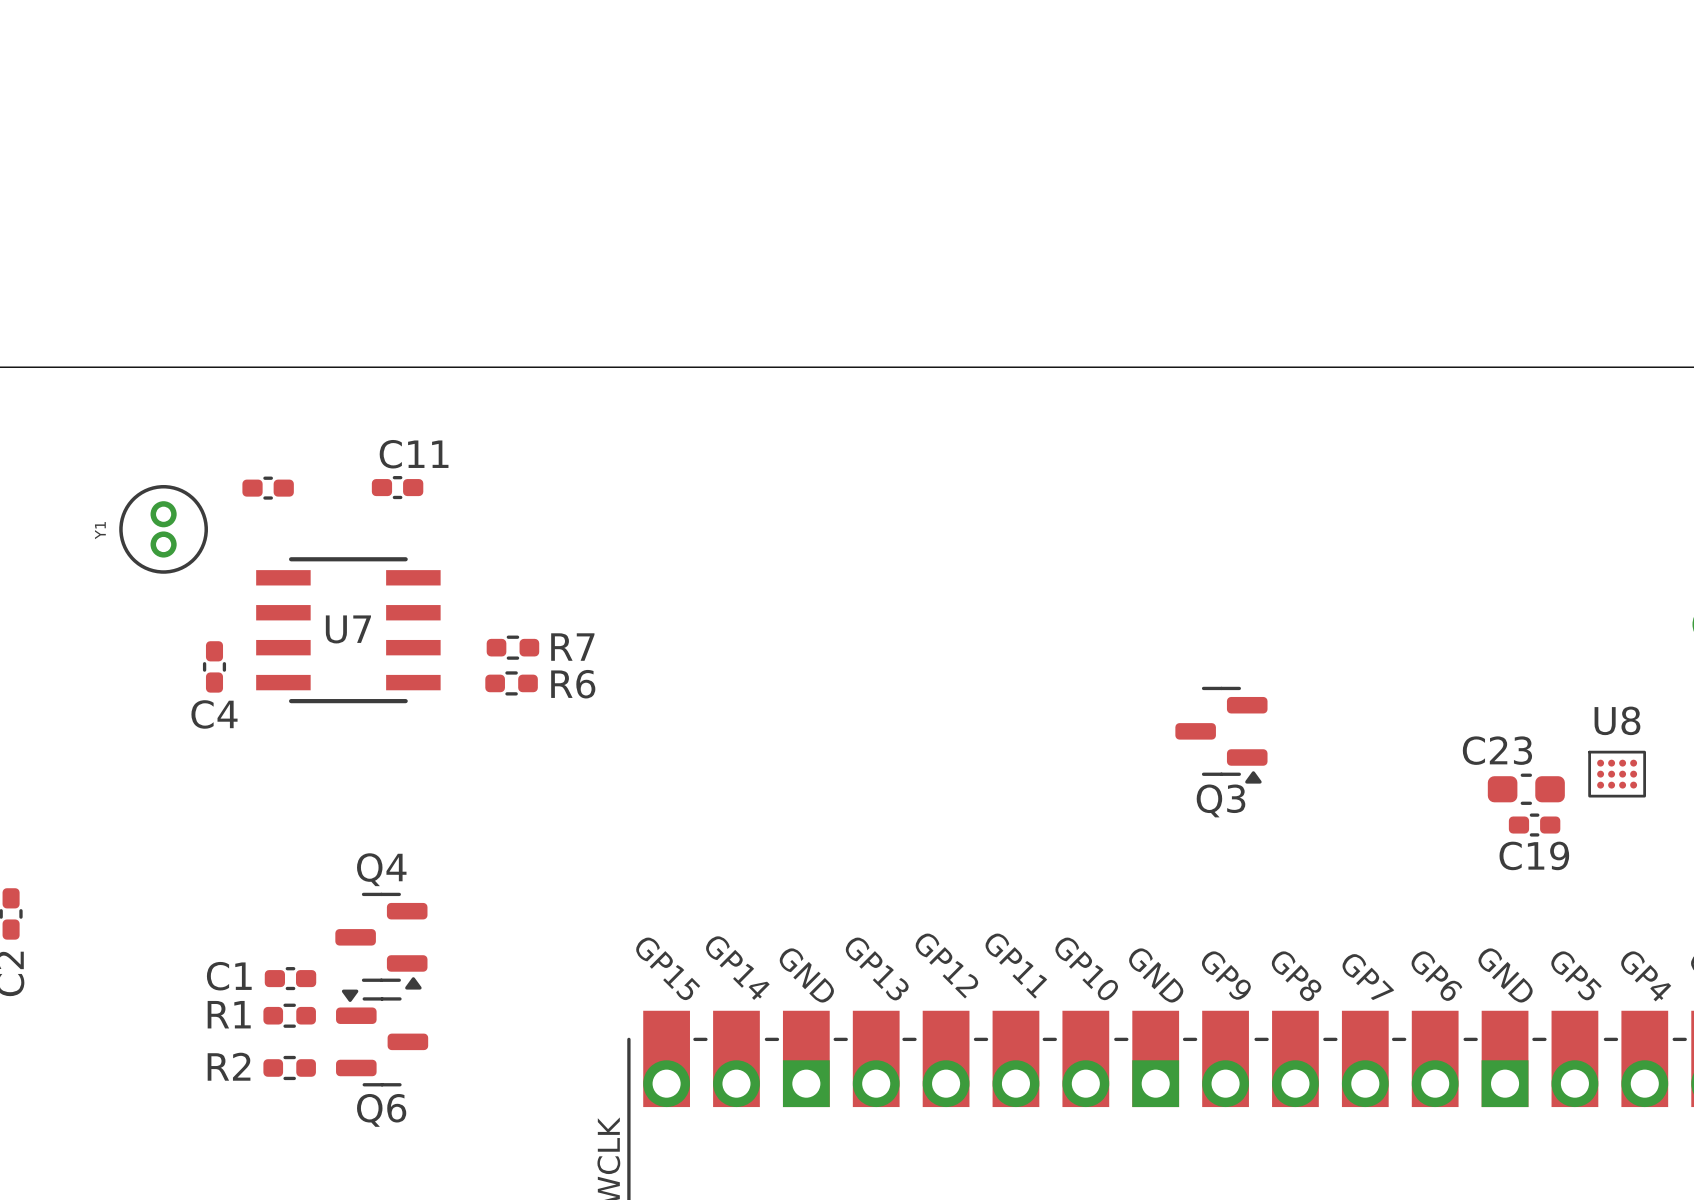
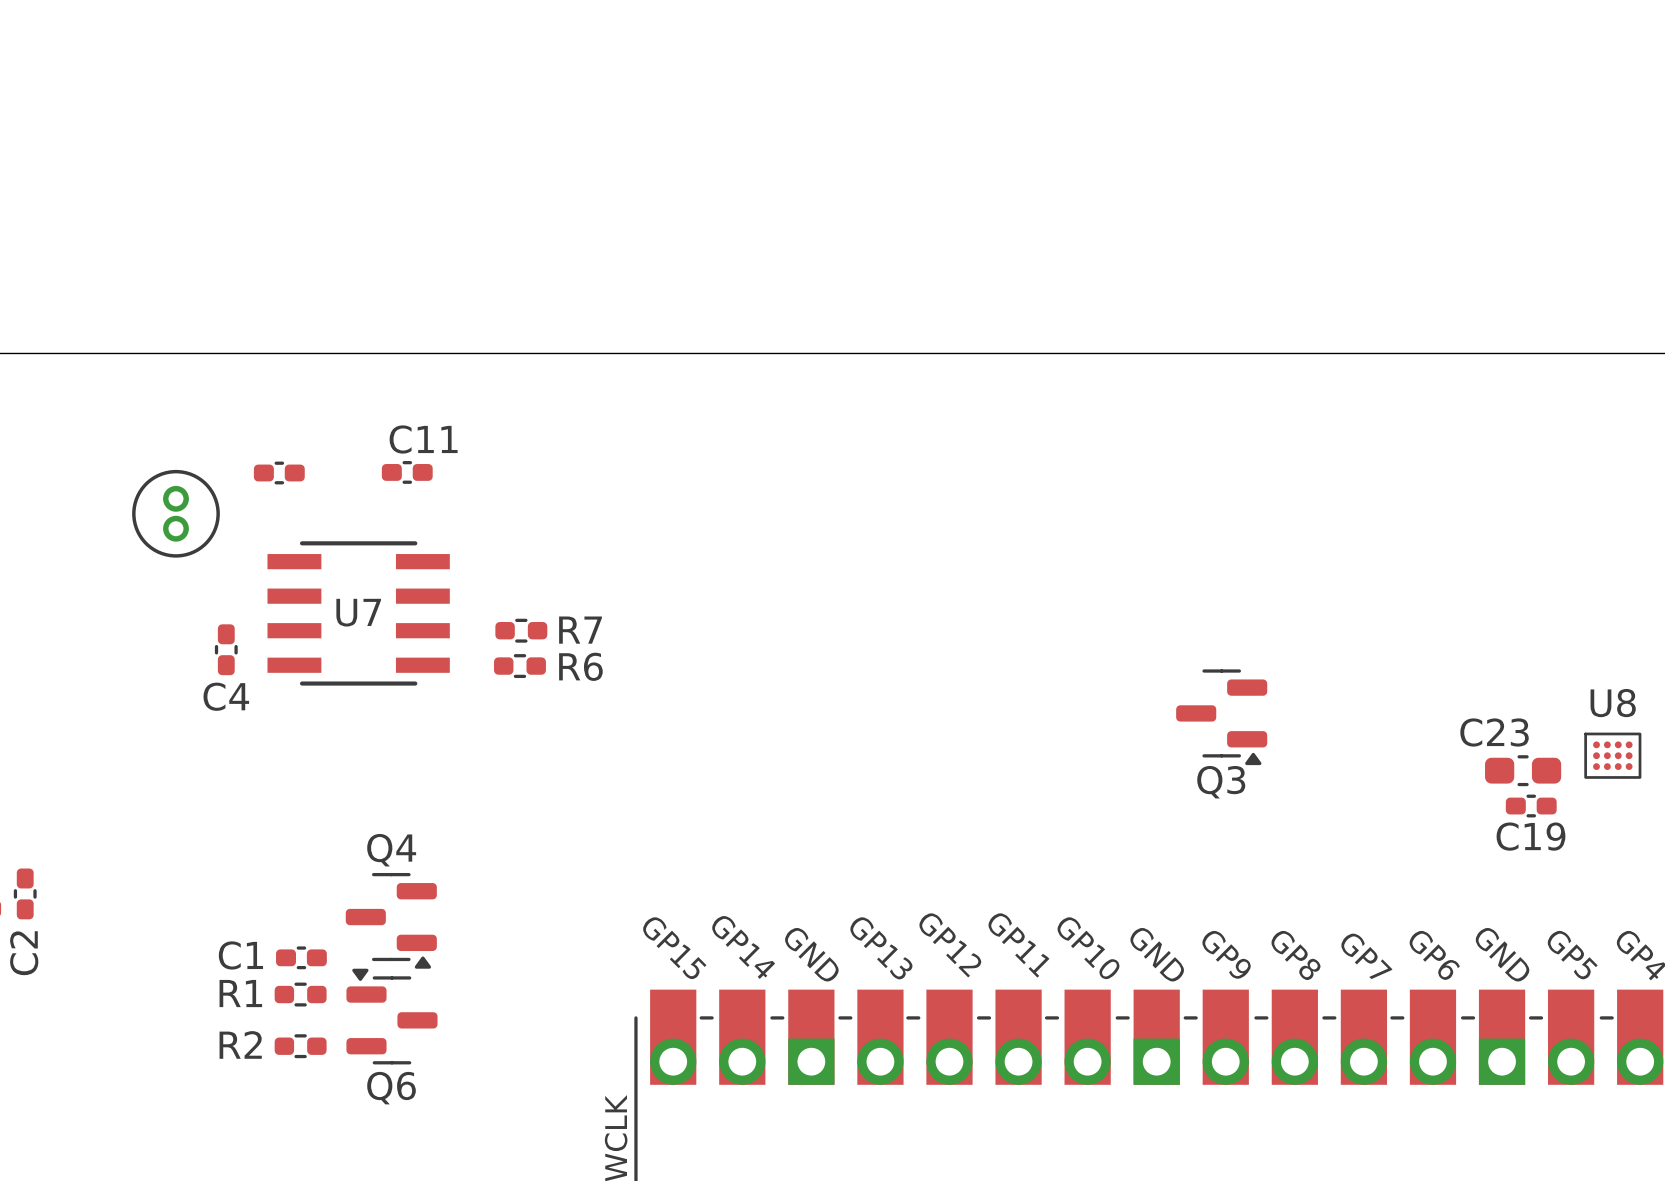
Y1 name: Y1 (100, 530) -> none

